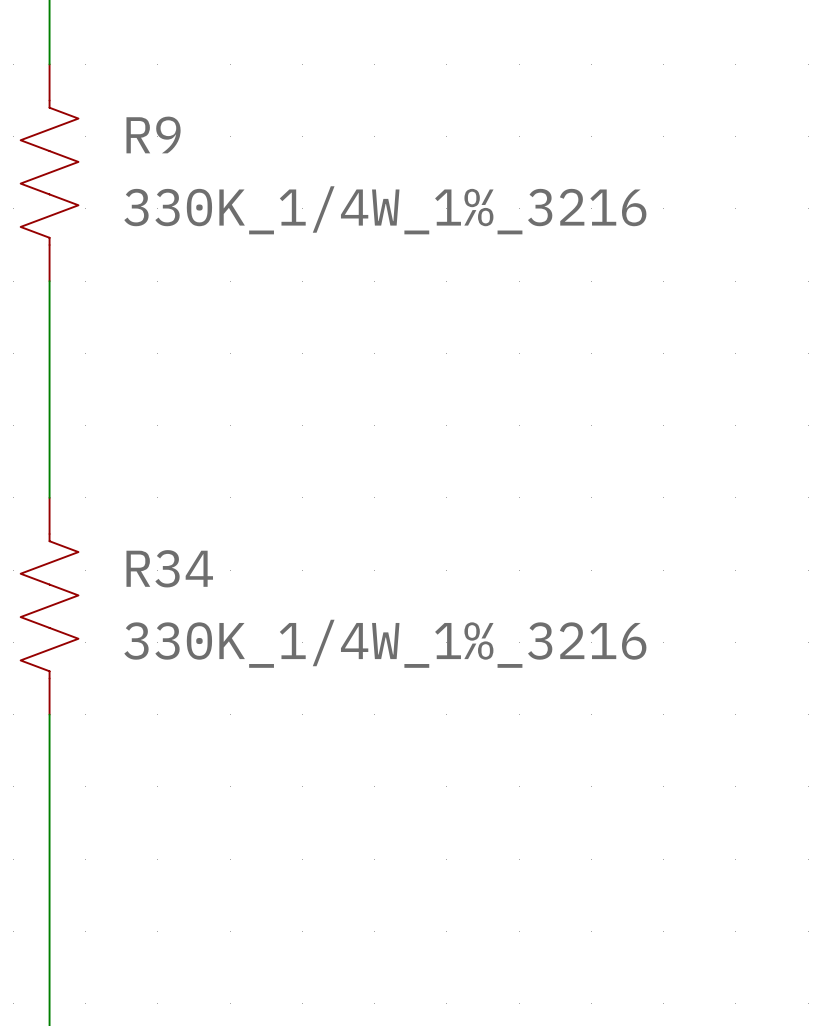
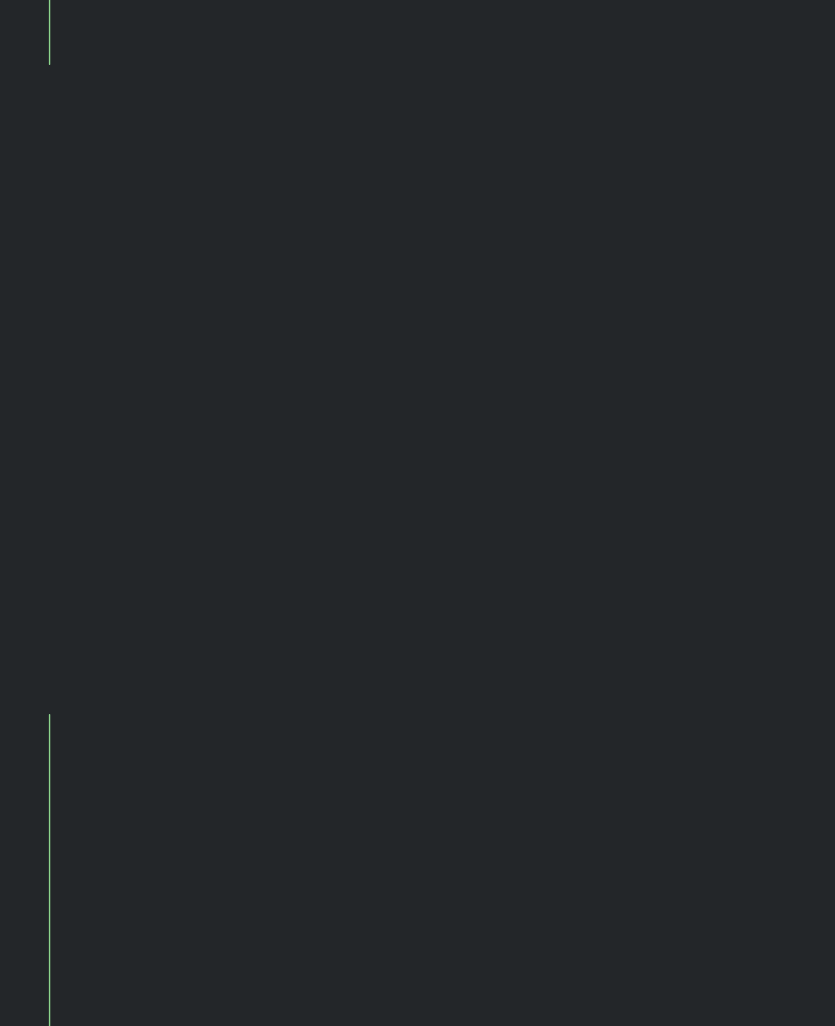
R9: 330K_1/4W_1%_3216 (49, 172) -> none
wire: (49, 281) (49, 497) -> none
R34: 330K_1/4W_1%_3216 (49, 606) -> none

